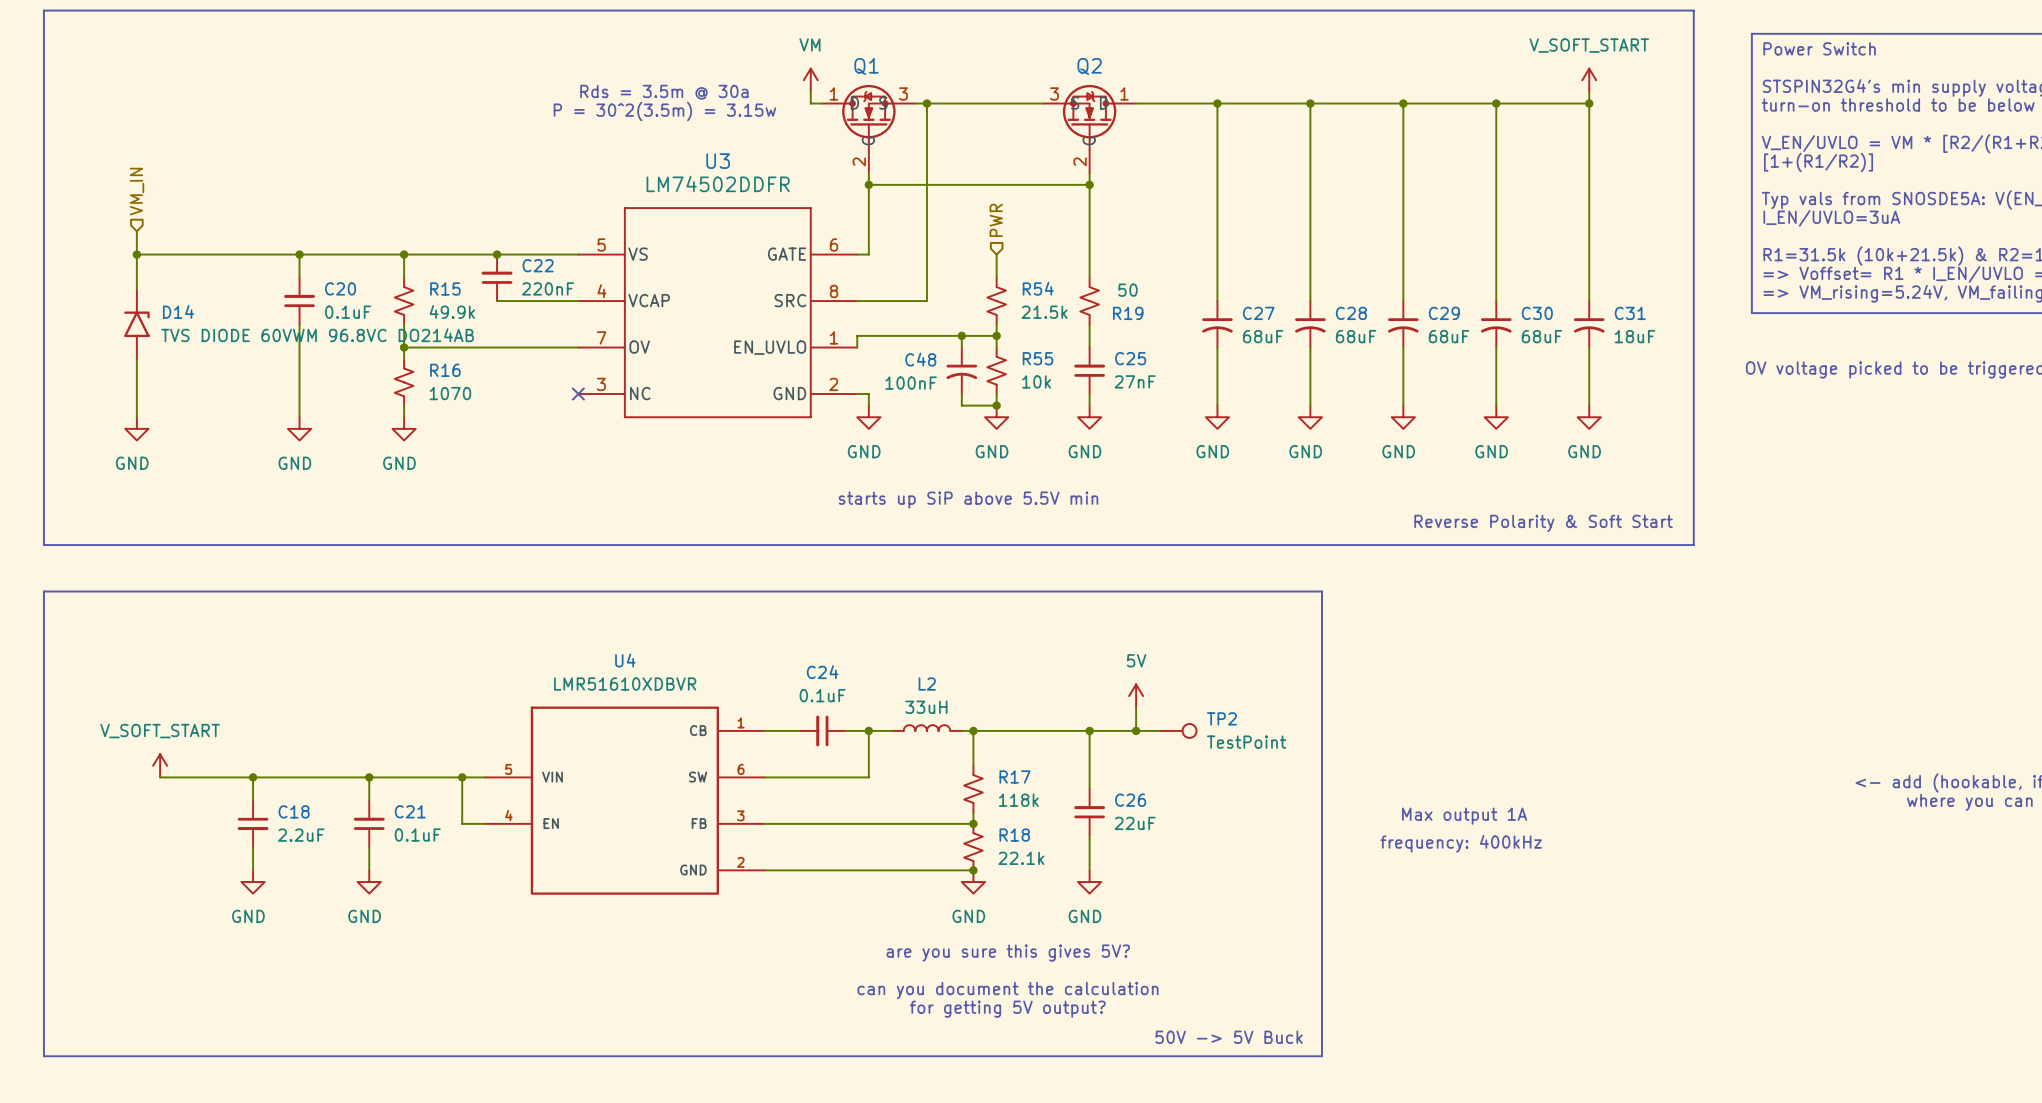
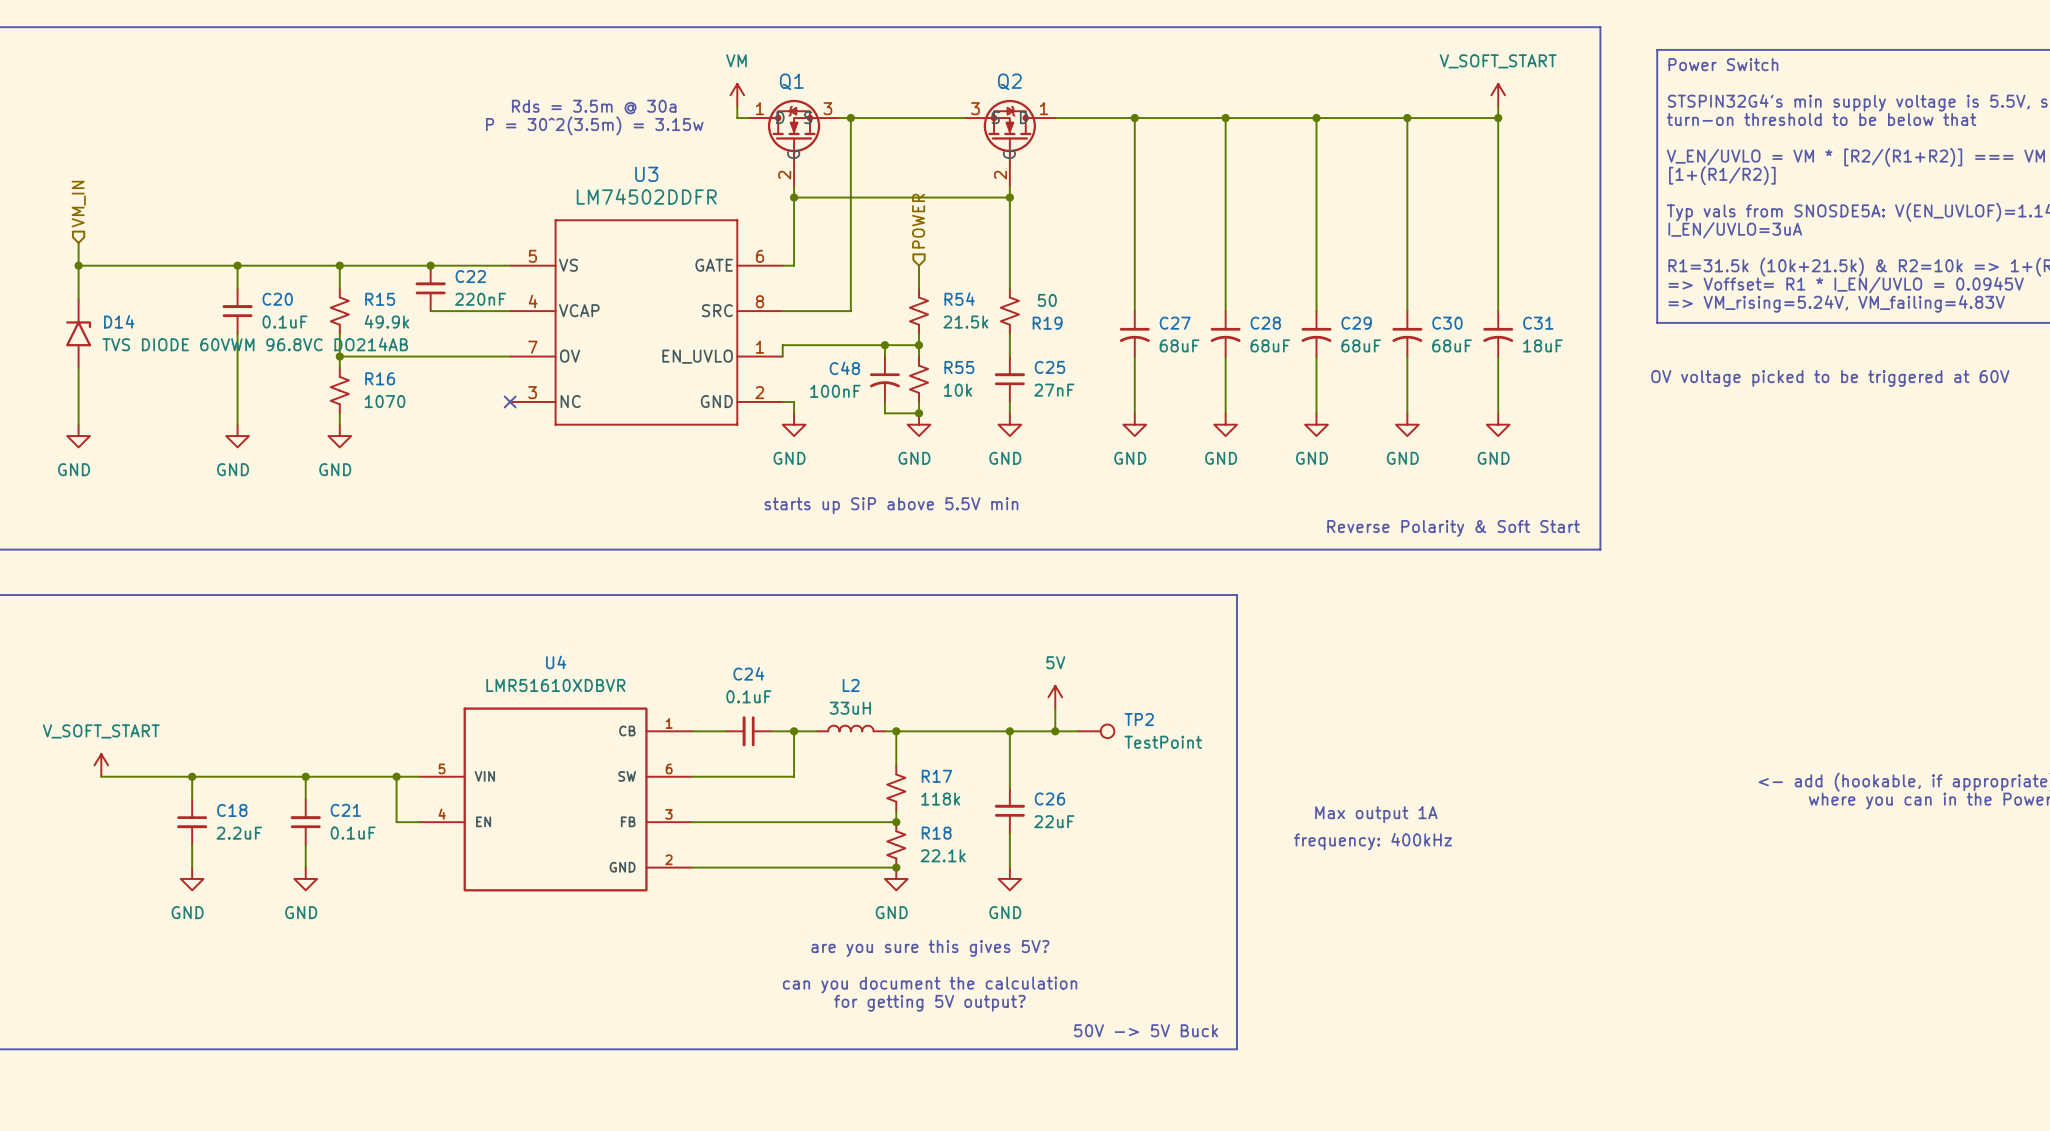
hierarchical label: PWR (996, 220) -> POWER (918, 221)

